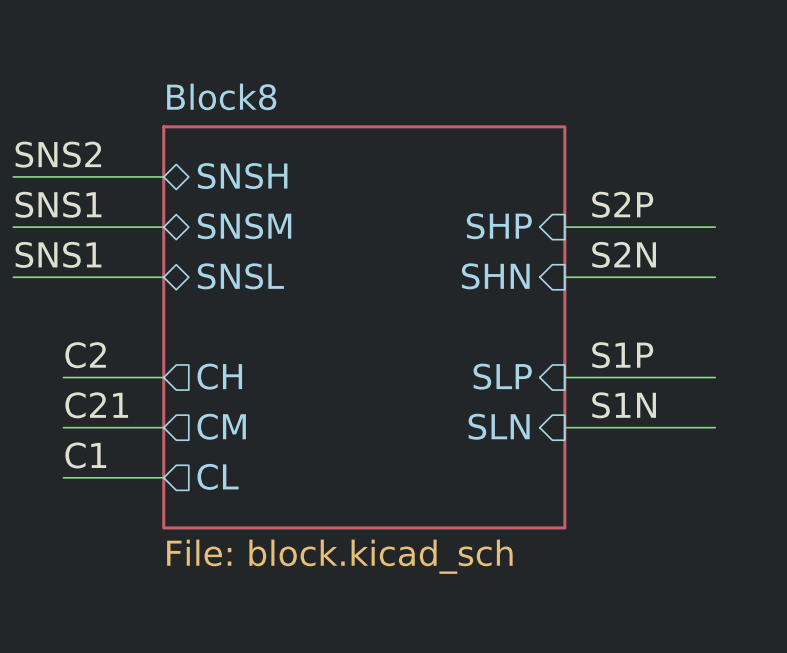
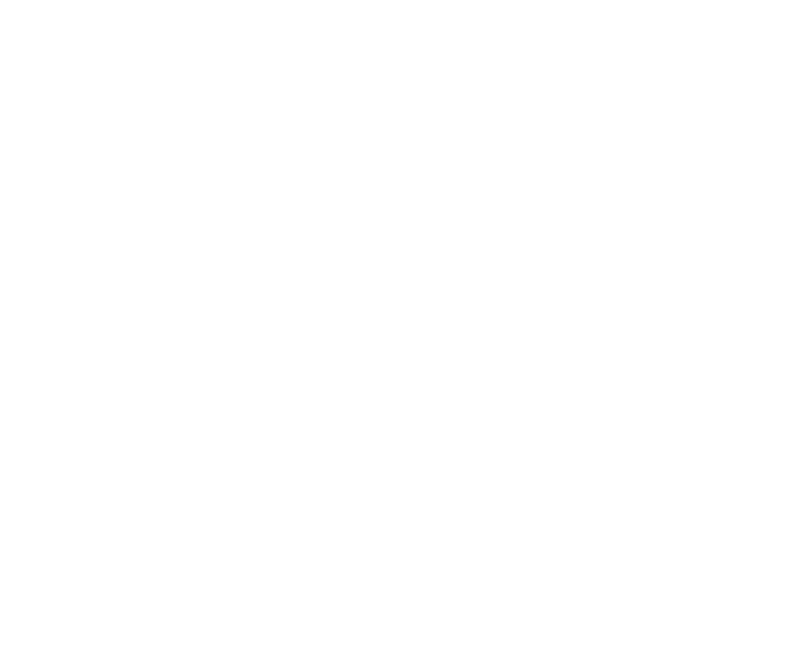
label: SNS2 (58, 154) -> none
wire: (13, 176) (163, 176) -> none
sheet pin: SNSH (242, 176) -> none
label: SNS1 (58, 204) -> none
label: S2P (622, 204) -> none
sheet pin: SNSM (244, 226) -> none
sheet pin: SHP (499, 226) -> none
wire: (13, 227) (163, 227) -> none
wire: (564, 227) (715, 227) -> none
label: SNS1 (58, 254) -> none
label: S2N (624, 254) -> none
sheet pin: SNSL (240, 276) -> none
sheet pin: SHN (495, 276) -> none
wire: (13, 277) (163, 277) -> none
wire: (564, 277) (715, 277) -> none
sheet Block8: File: block.kicad_sch (364, 327) -> none
label: C2 (85, 355) -> none
label: S1P (622, 355) -> none
sheet pin: CH (219, 376) -> none
sheet pin: SLP (502, 376) -> none
wire: (63, 377) (163, 377) -> none
wire: (564, 377) (715, 377) -> none
label: C21 (96, 405) -> none
label: S1N (624, 405) -> none
sheet pin: CM (221, 426) -> none
sheet pin: SLN (499, 426) -> none
wire: (63, 427) (163, 427) -> none
wire: (564, 427) (715, 427) -> none
label: C1 (85, 455) -> none
sheet pin: CL (218, 476) -> none
wire: (63, 477) (163, 477) -> none

